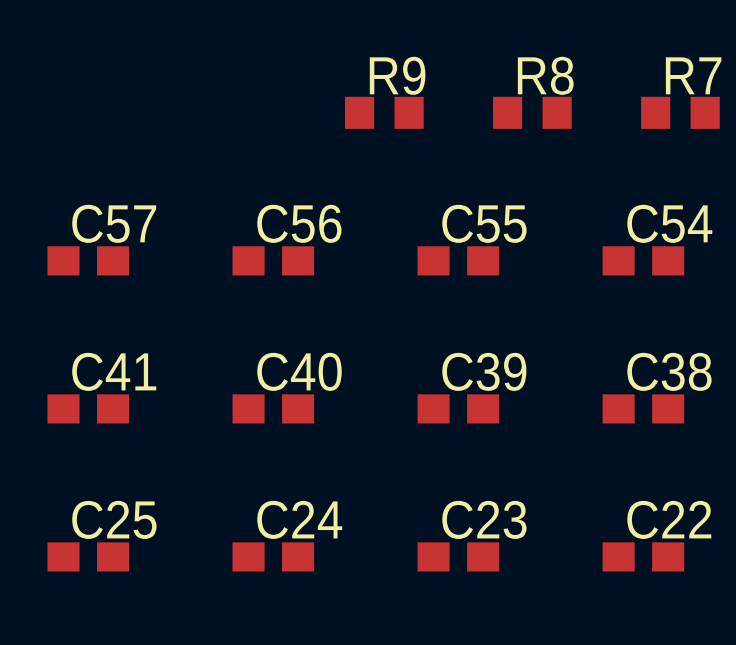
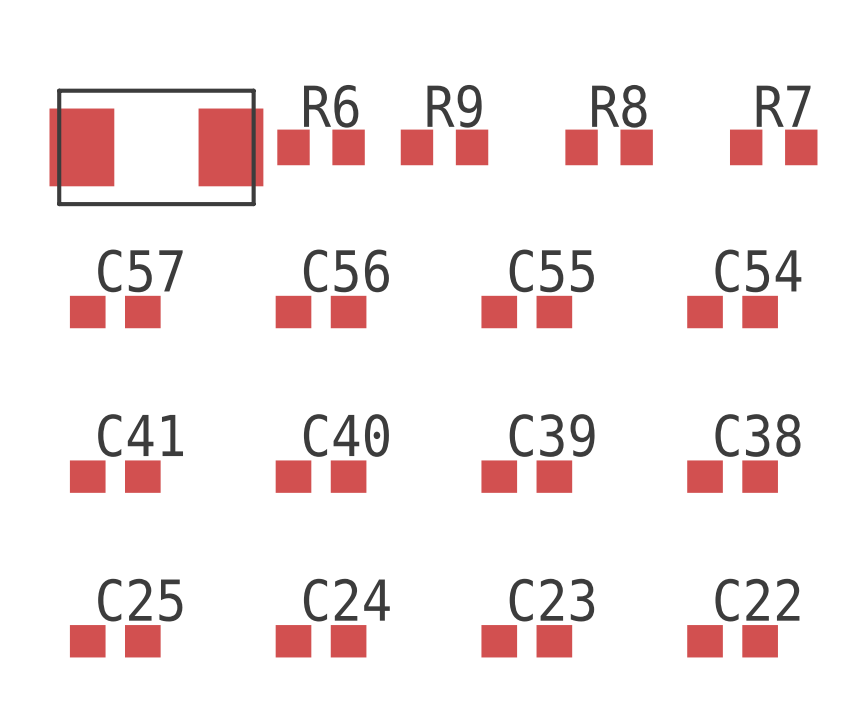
part: none -> (156, 147)
R6: none -> (321, 147)

